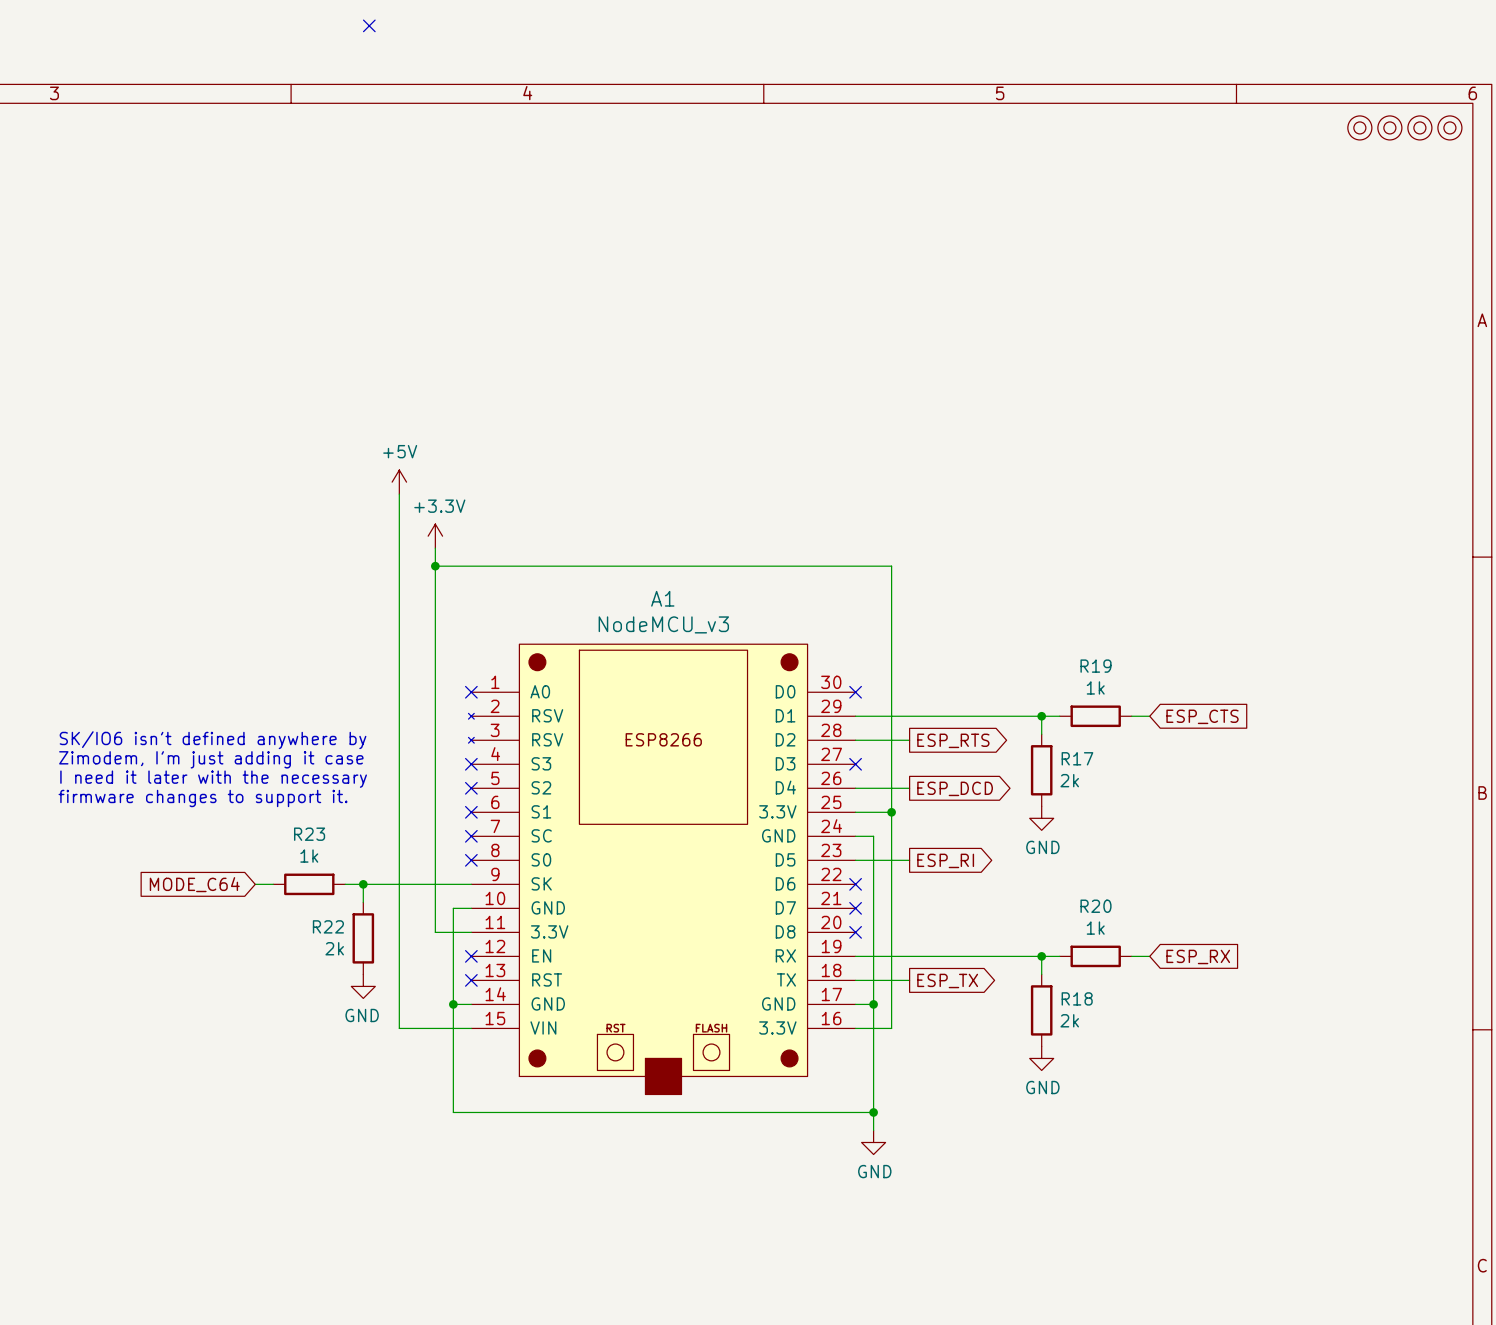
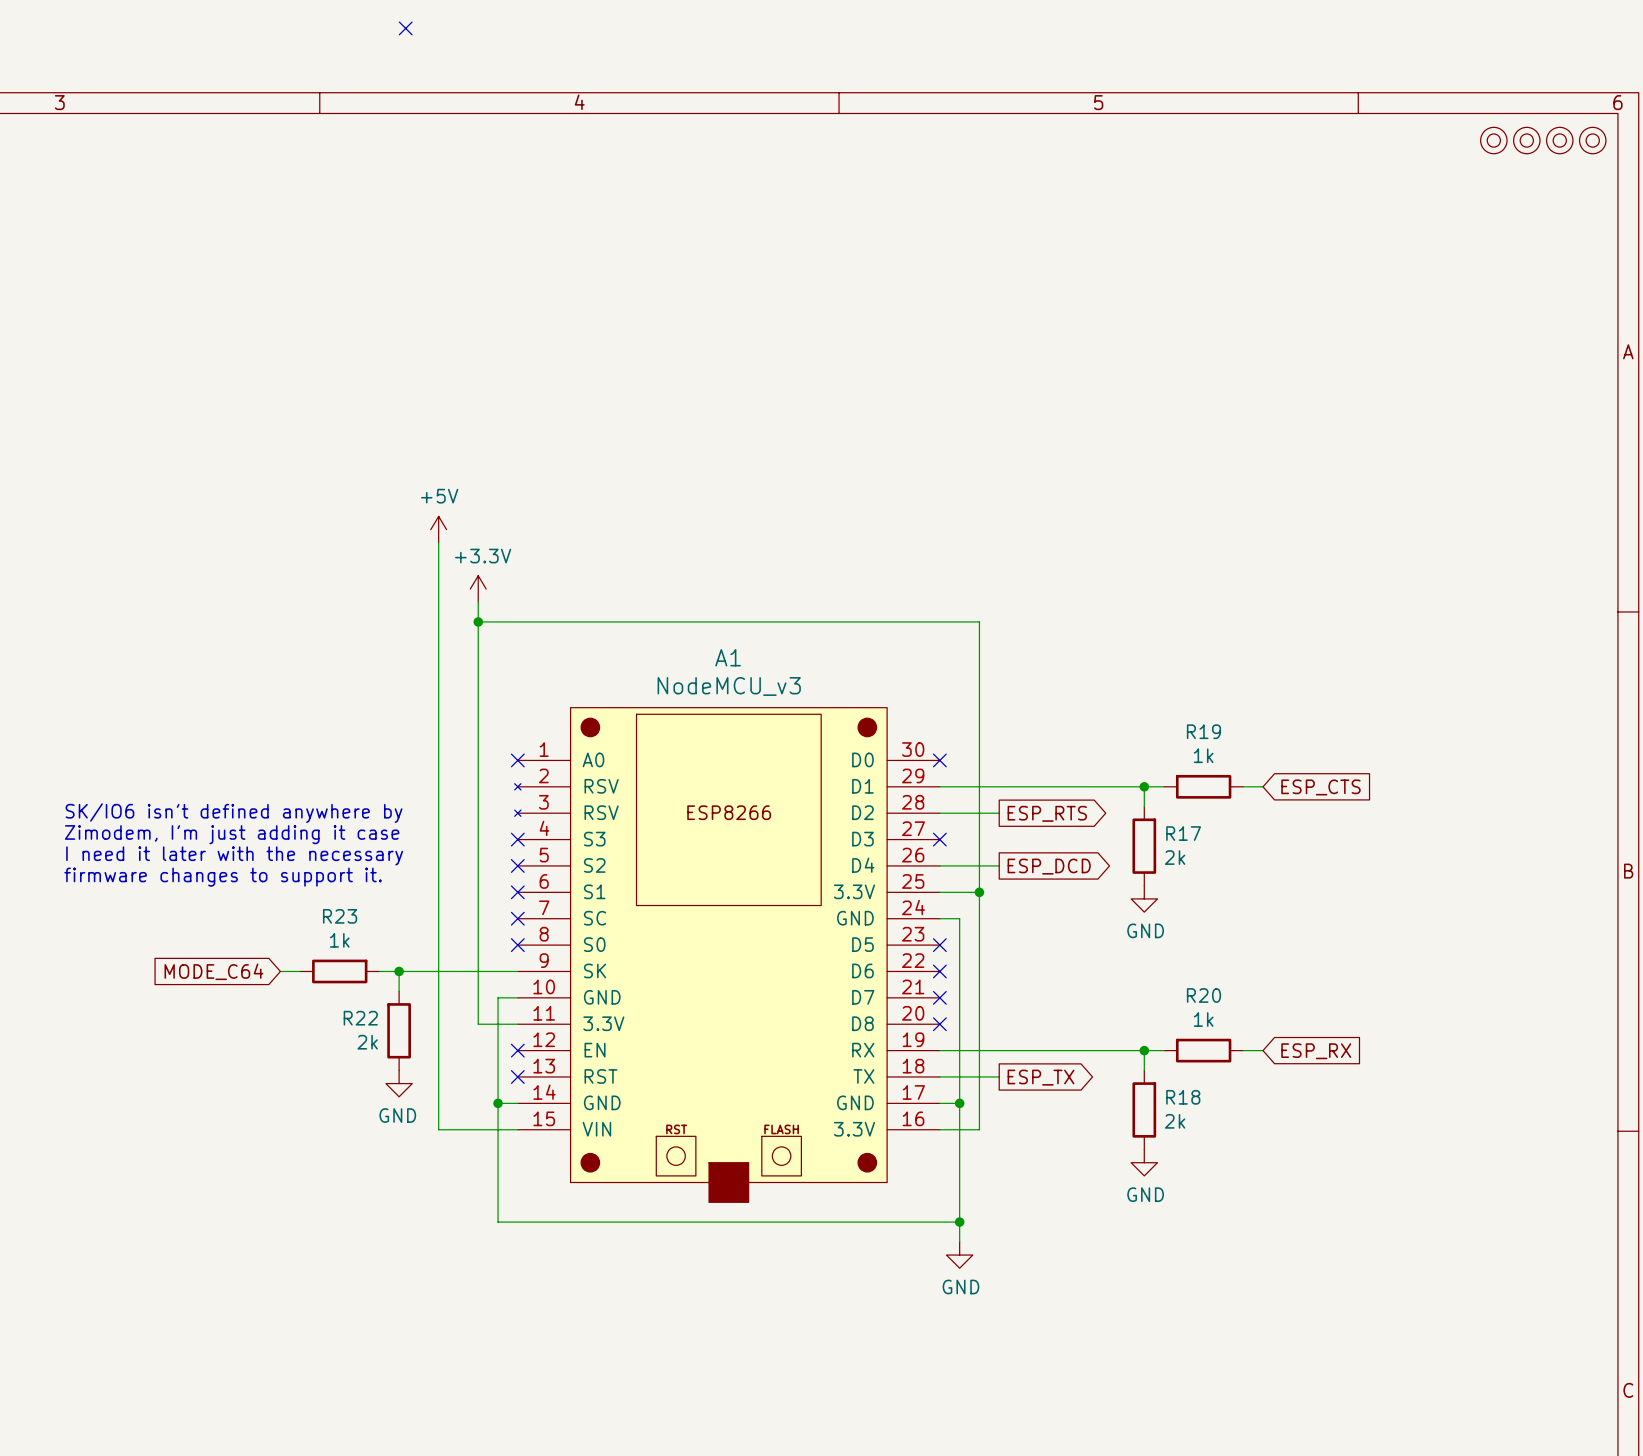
wire: (855, 860) (909, 860) -> none
no-connect mark: none -> (939, 945)
global label: ESP_RI (945, 860) -> none

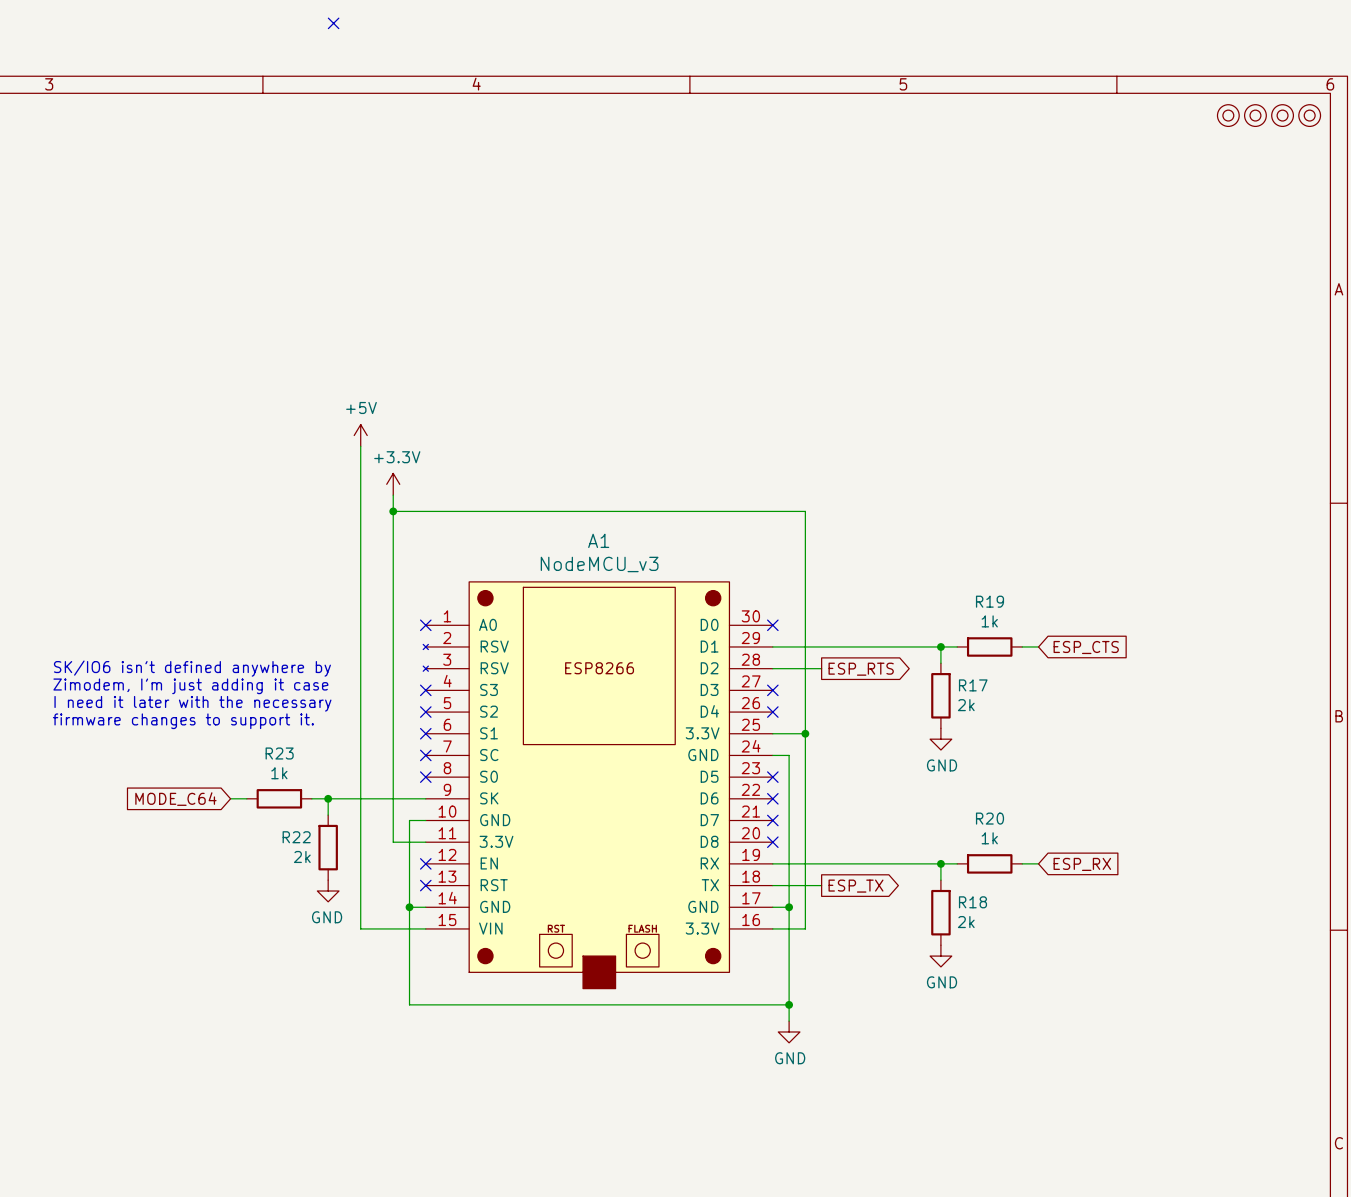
wire: (939, 865) (999, 865) -> none
no-connect mark: none -> (772, 712)
global label: ESP_DCD (1049, 866) -> none

